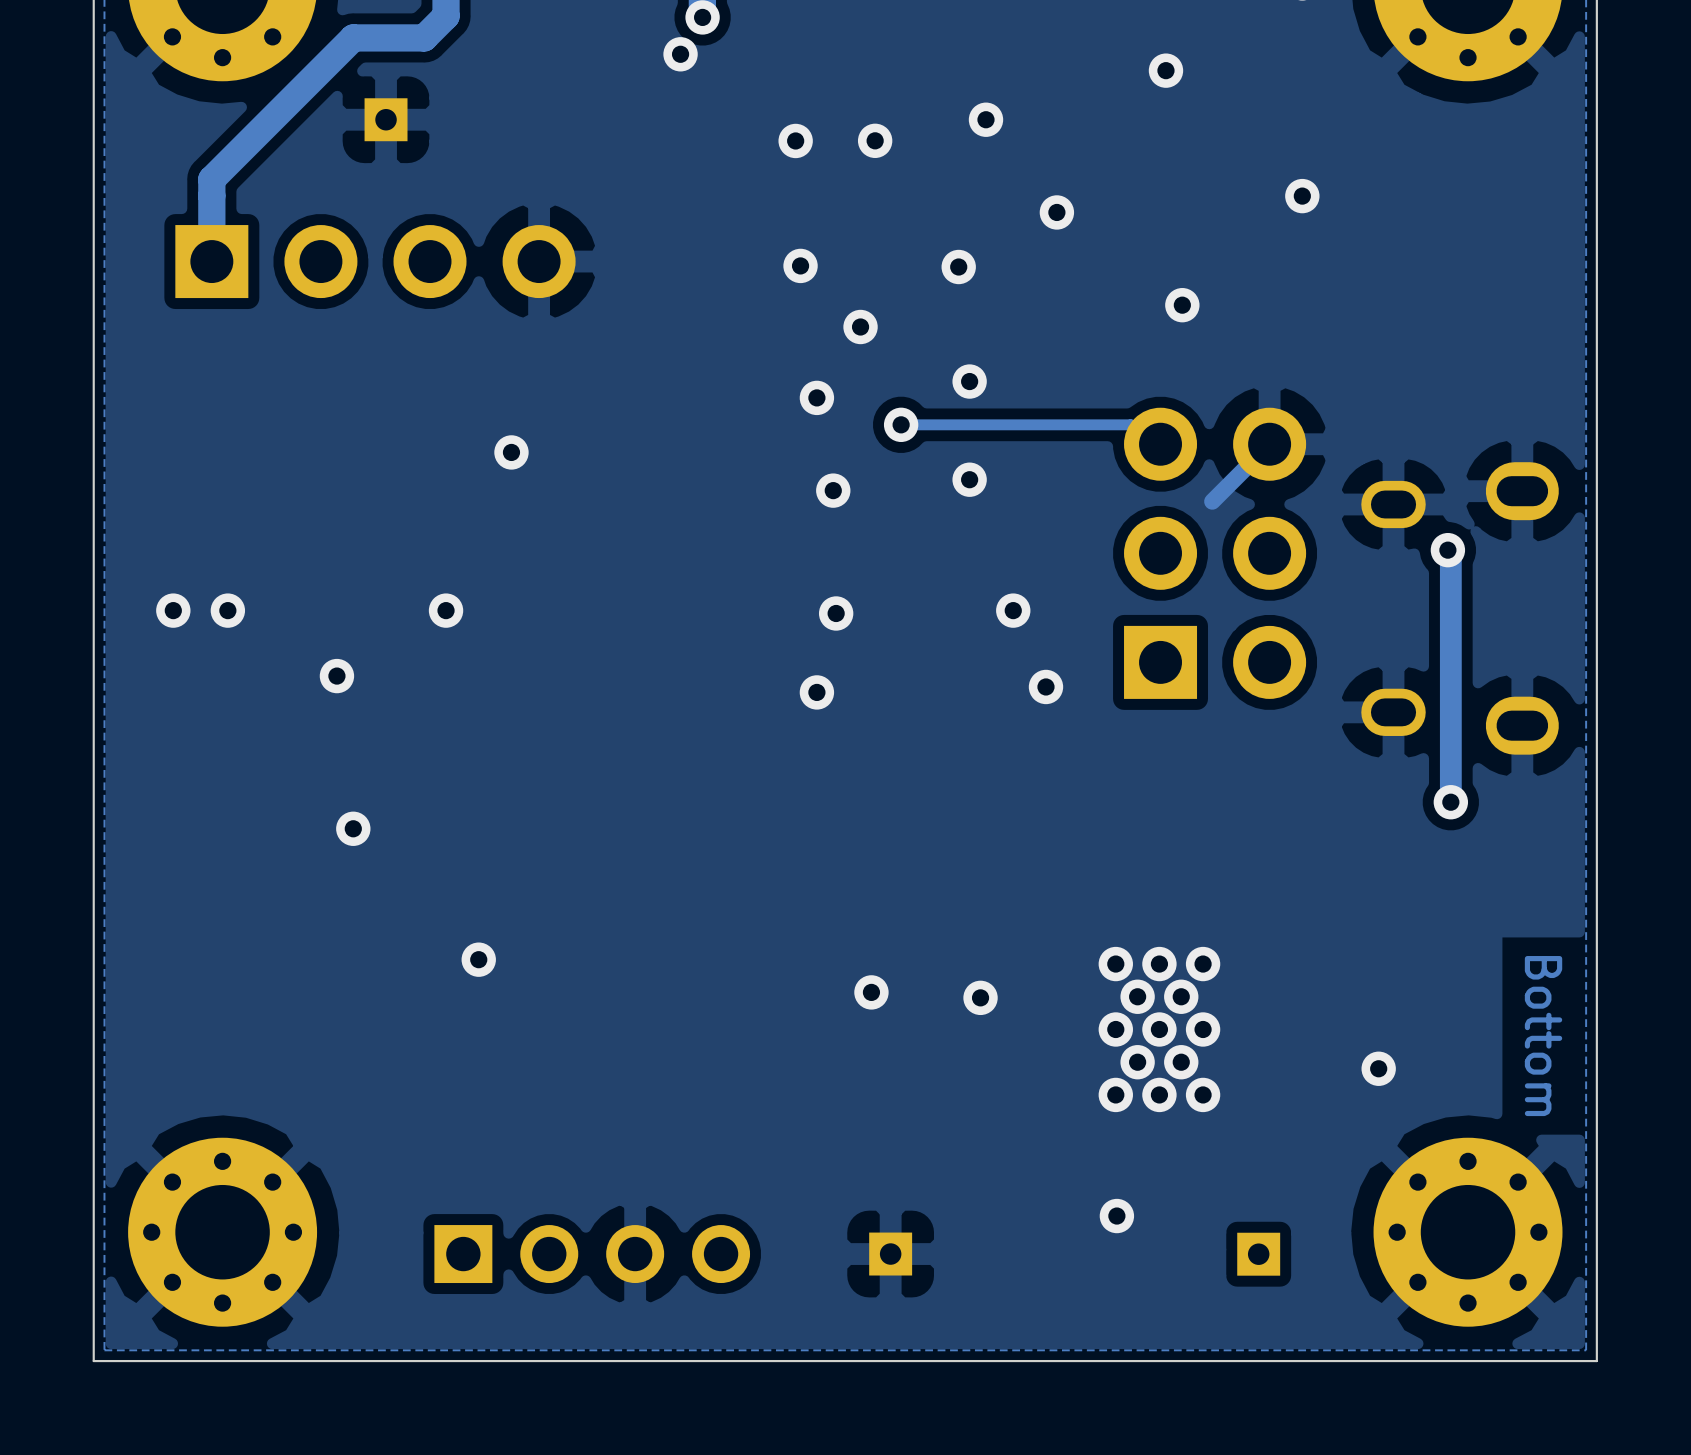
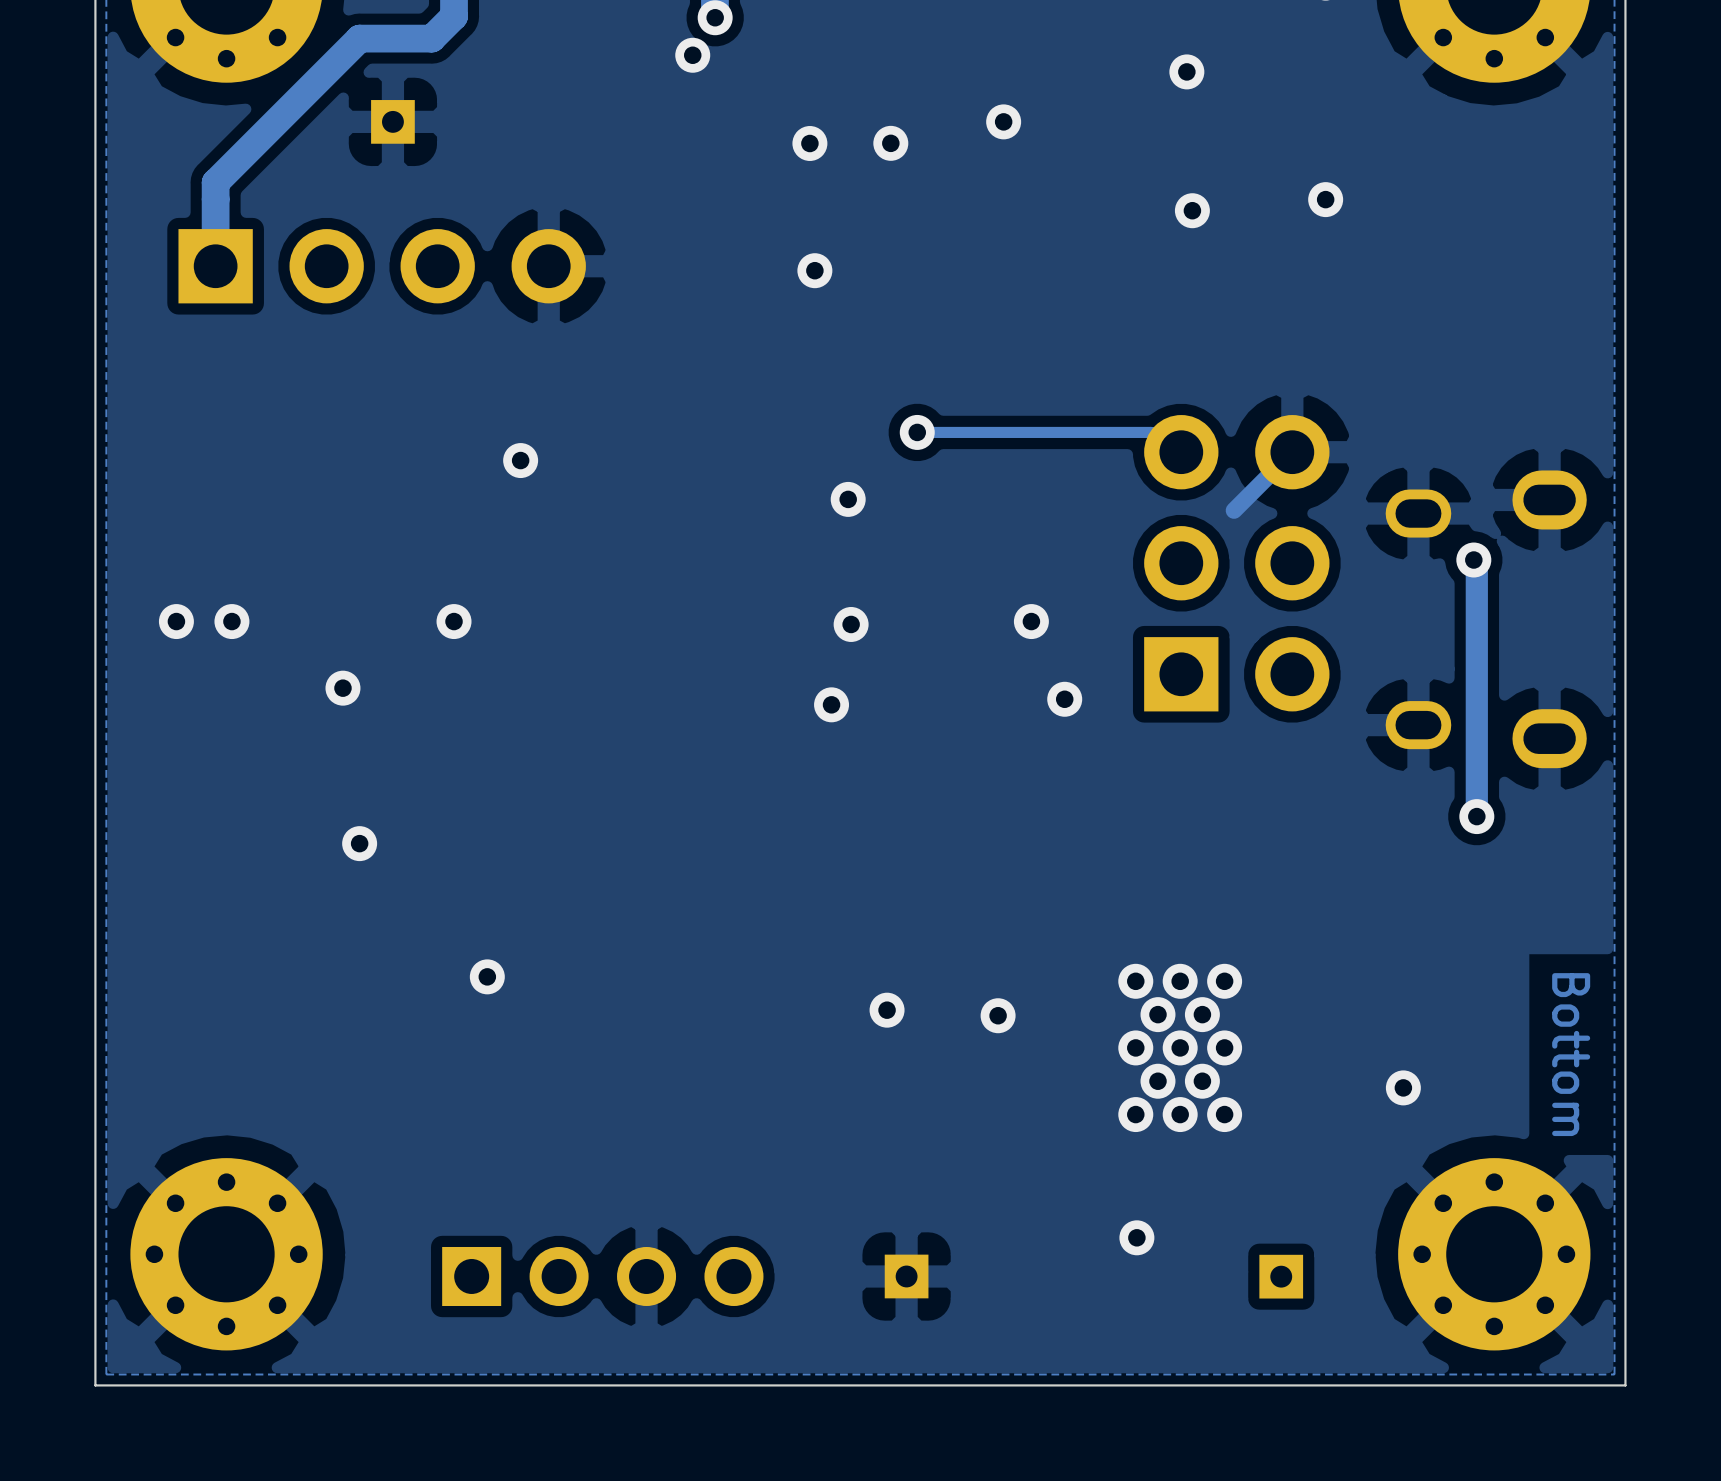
via: none -> (1192, 210)
via: (1056, 212) -> none
via: (958, 267) -> none
via: (1182, 305) -> none
via: (860, 327) -> none
via: (969, 381) -> none
via: (816, 397) -> none
via: (969, 479) -> none

